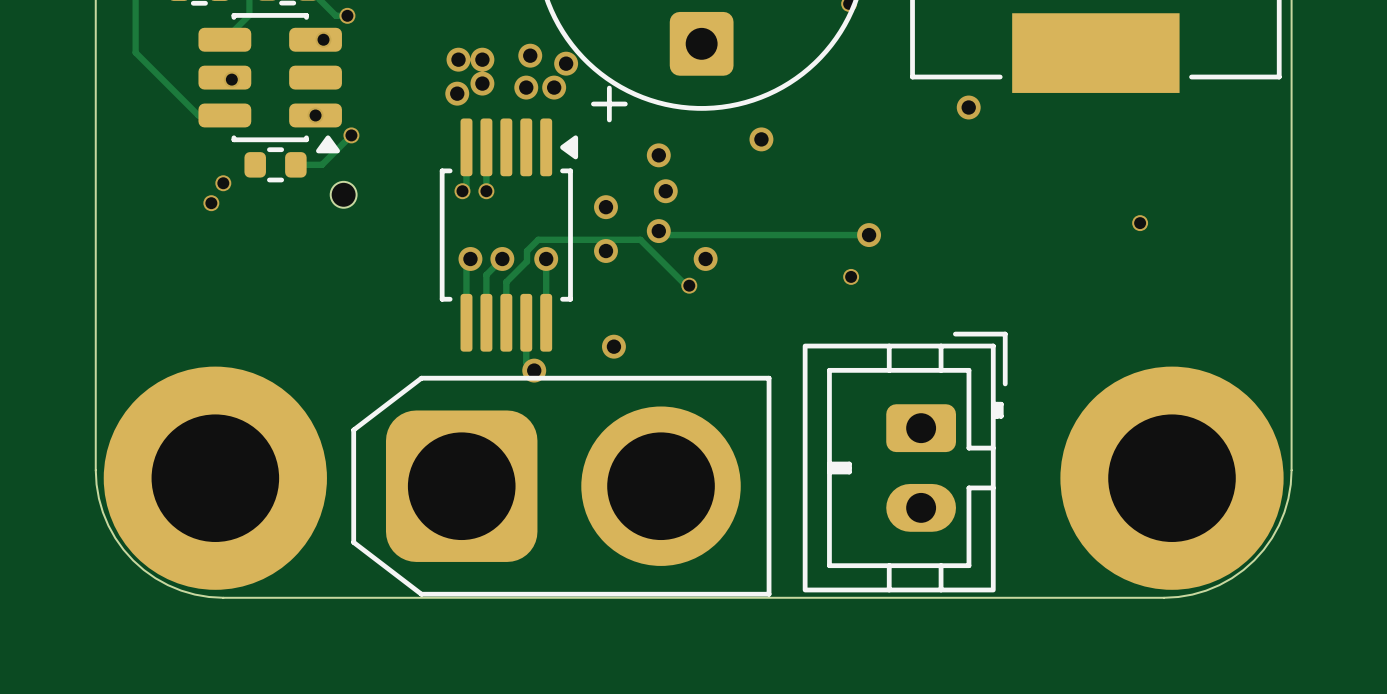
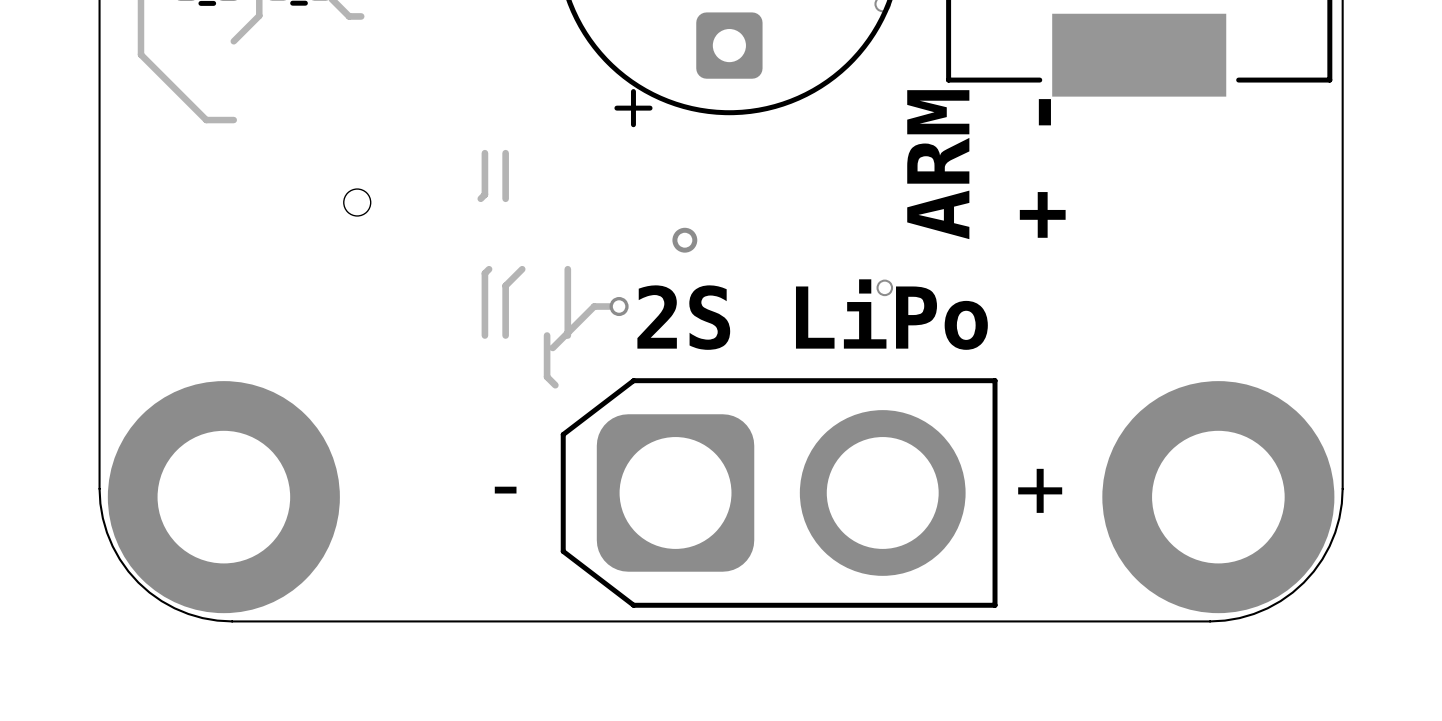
via: (347, 15) -> none
via: (323, 39) -> none
via: (530, 55) -> none
via: (458, 59) -> none
via: (482, 59) -> none
via: (566, 63) -> none
via: (231, 79) -> none
part: (270, 83) -> none
via: (482, 83) -> none
via: (526, 87) -> none
via: (554, 87) -> none
via: (457, 93) -> none
via: (968, 107) -> none
via: (315, 115) -> none
track: (351, 135) (321, 164) (295, 164) -> none
via: (351, 135) -> none
via: (761, 139) -> none
via: (658, 155) -> none
text: none -> + - (1042, 168)
text: none -> ARM (938, 164)
part: (275, 164) -> none
via: (223, 183) -> none
via: (462, 191) -> none
via: (486, 191) -> none
via: (665, 191) -> none
via: (211, 203) -> none
via: (605, 207) -> none
via: (1140, 223) -> none
track: (658, 231) (662, 235) (869, 235) -> none
part: (508, 235) -> none
via: (869, 235) -> none
via: (605, 251) -> none
via: (470, 258) -> none
via: (502, 258) -> none
via: (546, 258) -> none
via: (705, 258) -> none
track: (689, 285) (686, 285) (640, 239) (538, 239) (527, 251) (527, 261) (506, 282) (506, 322) -> none
via: (689, 285) -> none
track: none -> (619, 306) (594, 306) (552, 347)
via: none -> (619, 306)
text: none -> 2S LiPo (812, 314)
via: (613, 346) -> none
via: (534, 370) -> none
part: (905, 462) -> none
part: none -> (779, 492)
part: (561, 486) -> none

